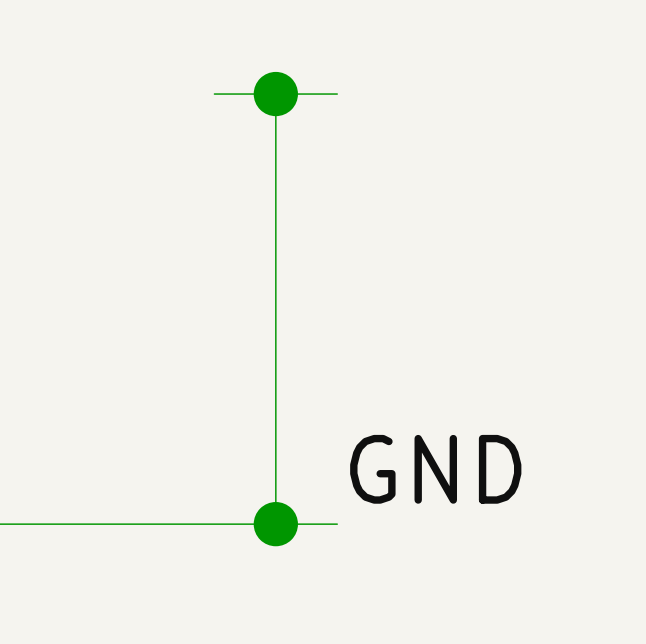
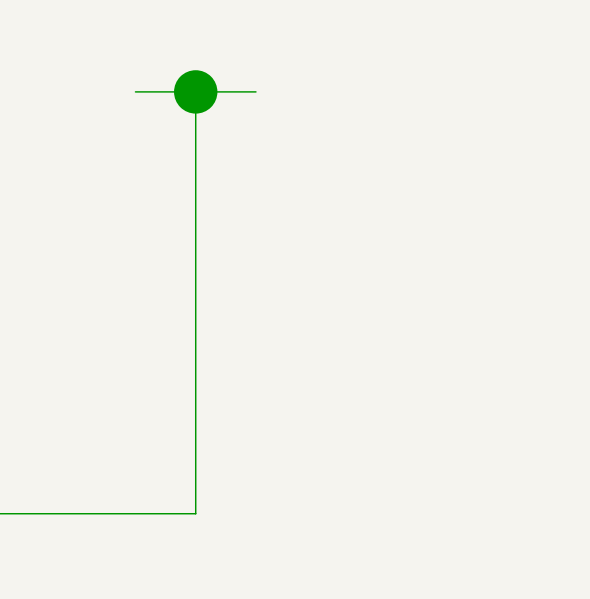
label: GND (435, 469) -> none
wire: (275, 524) (337, 524) -> none
junction: (275, 524) -> none

